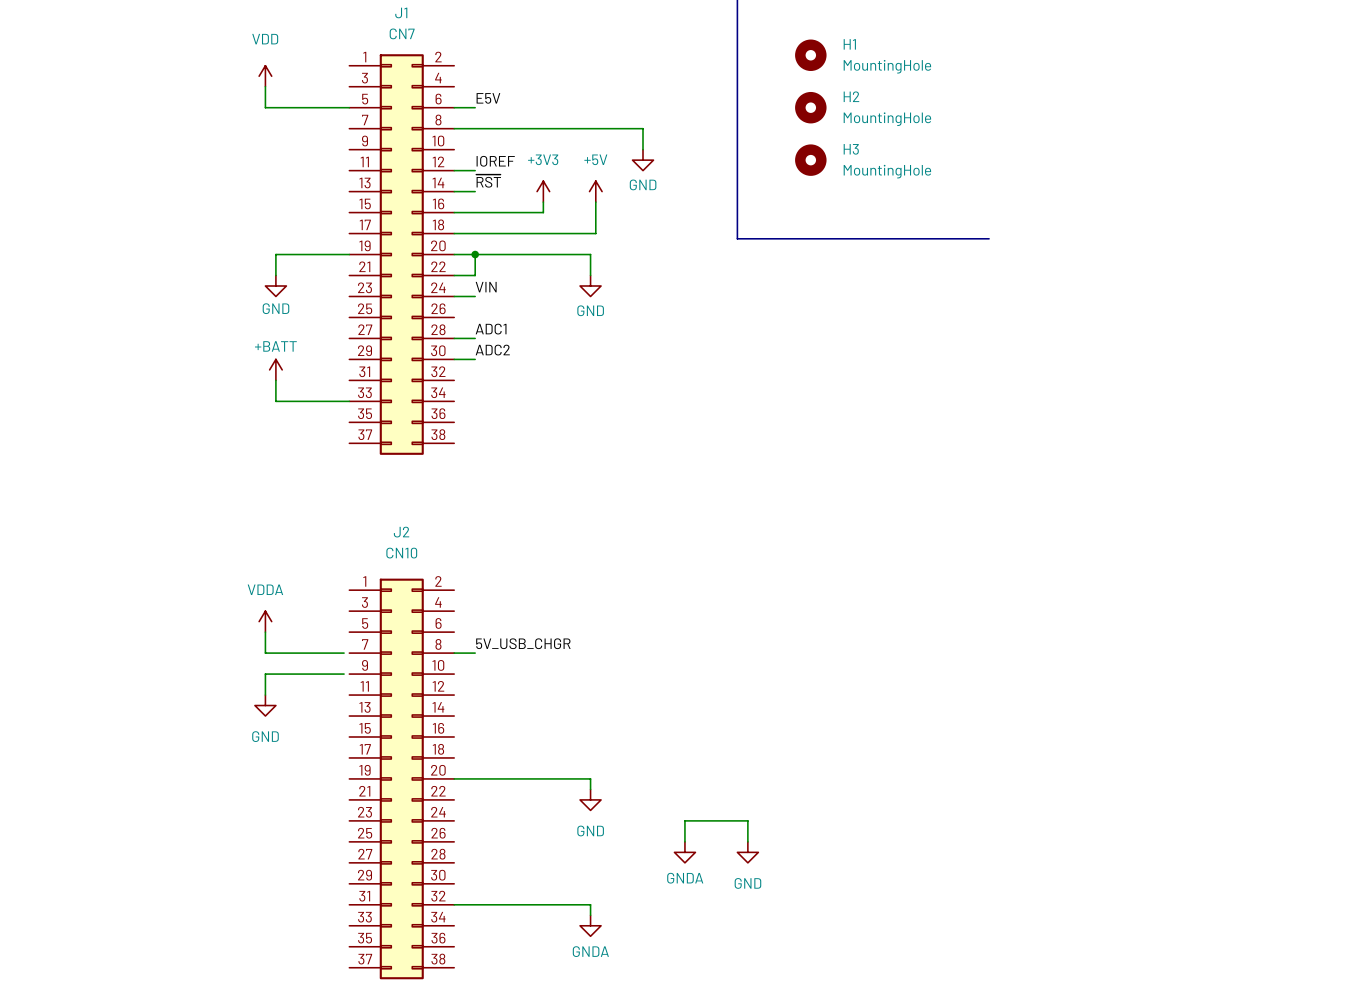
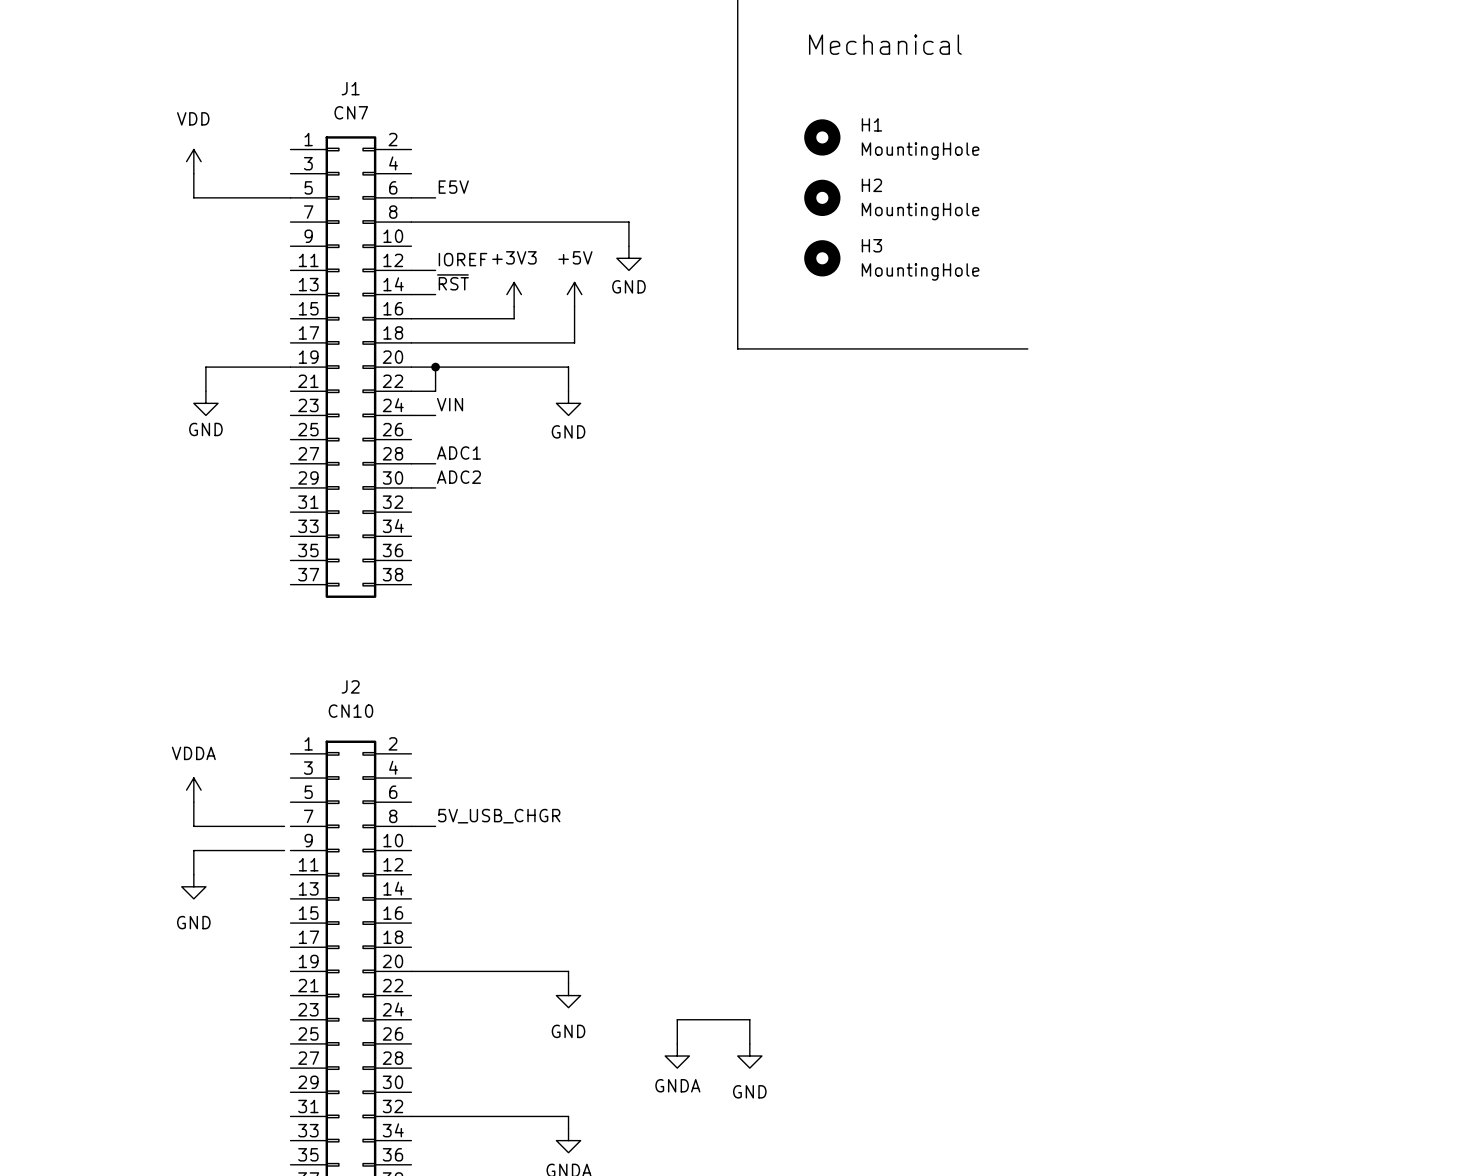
power symbol: +BATT (275, 369) -> none
wire: (275, 380) (275, 401) (349, 401) -> none

